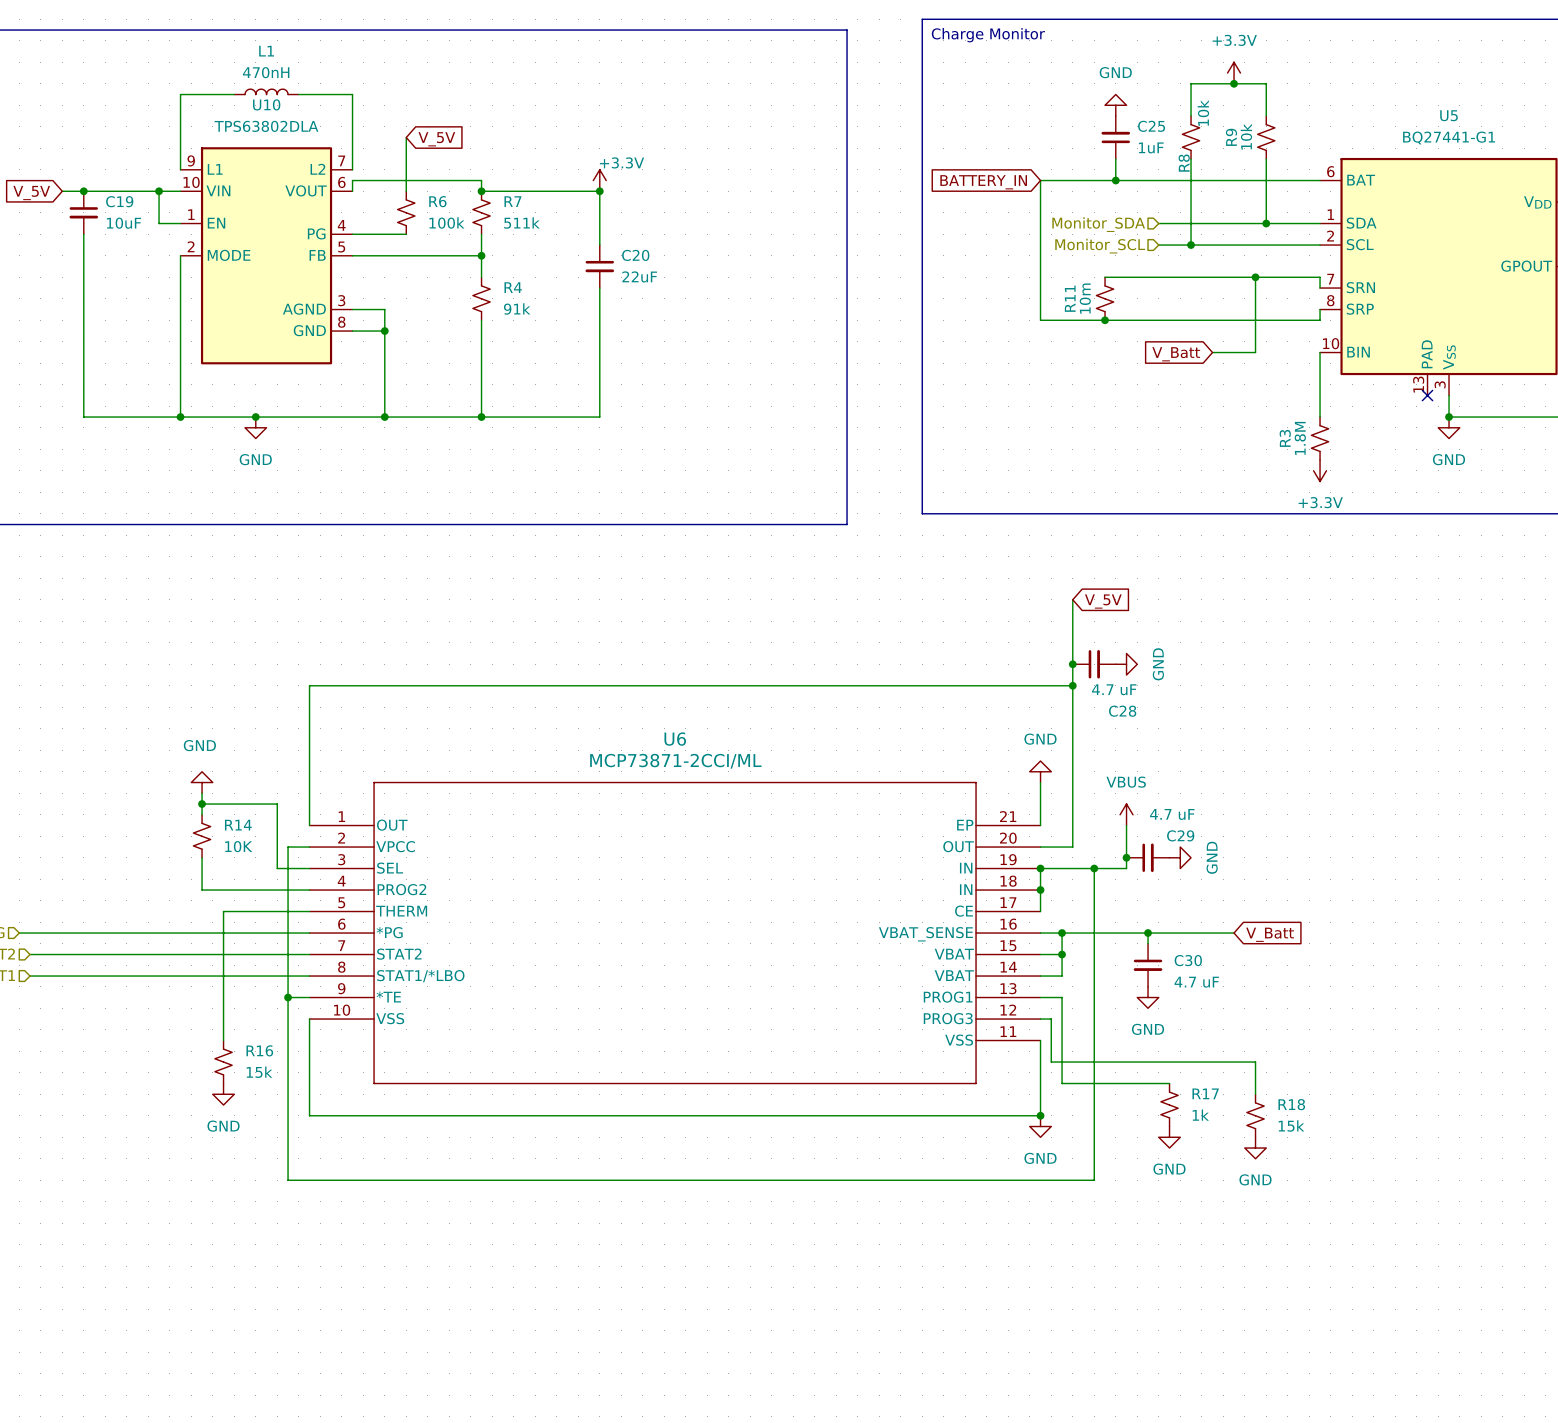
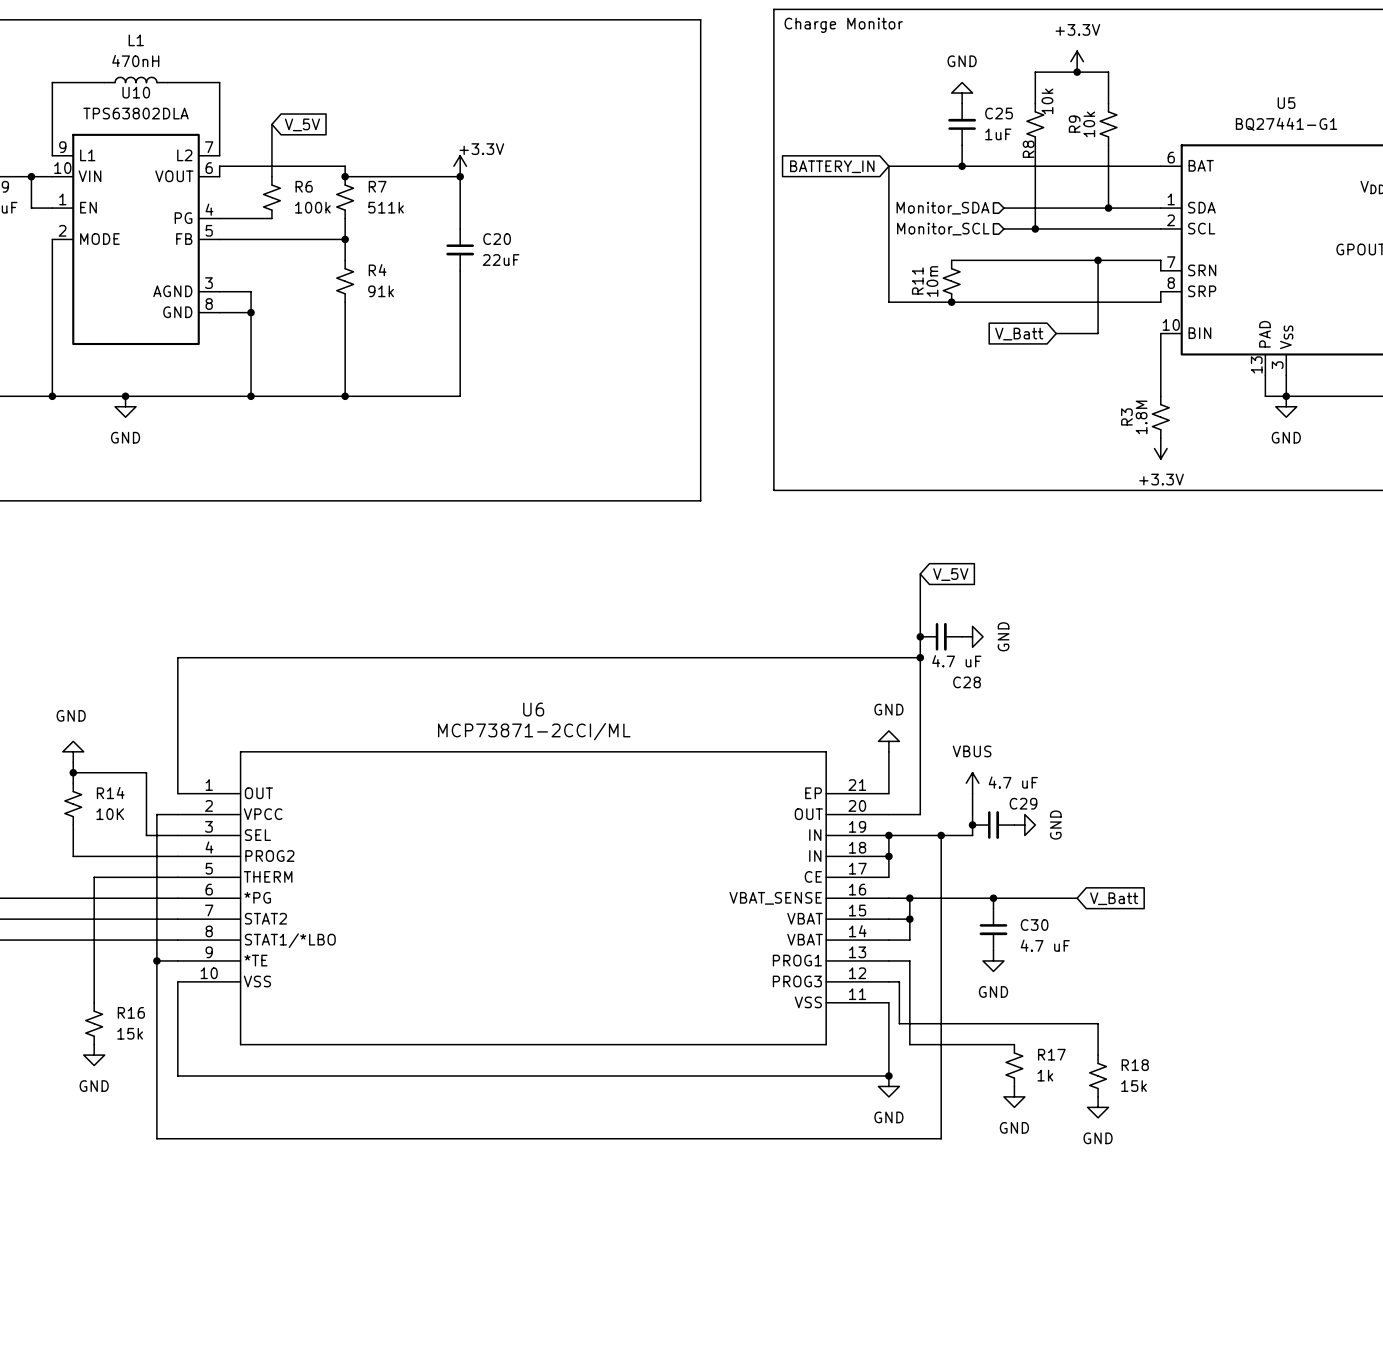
wire: none -> (1265, 375) (1265, 396) (1286, 396)
no-connect mark: (1427, 395) -> none

